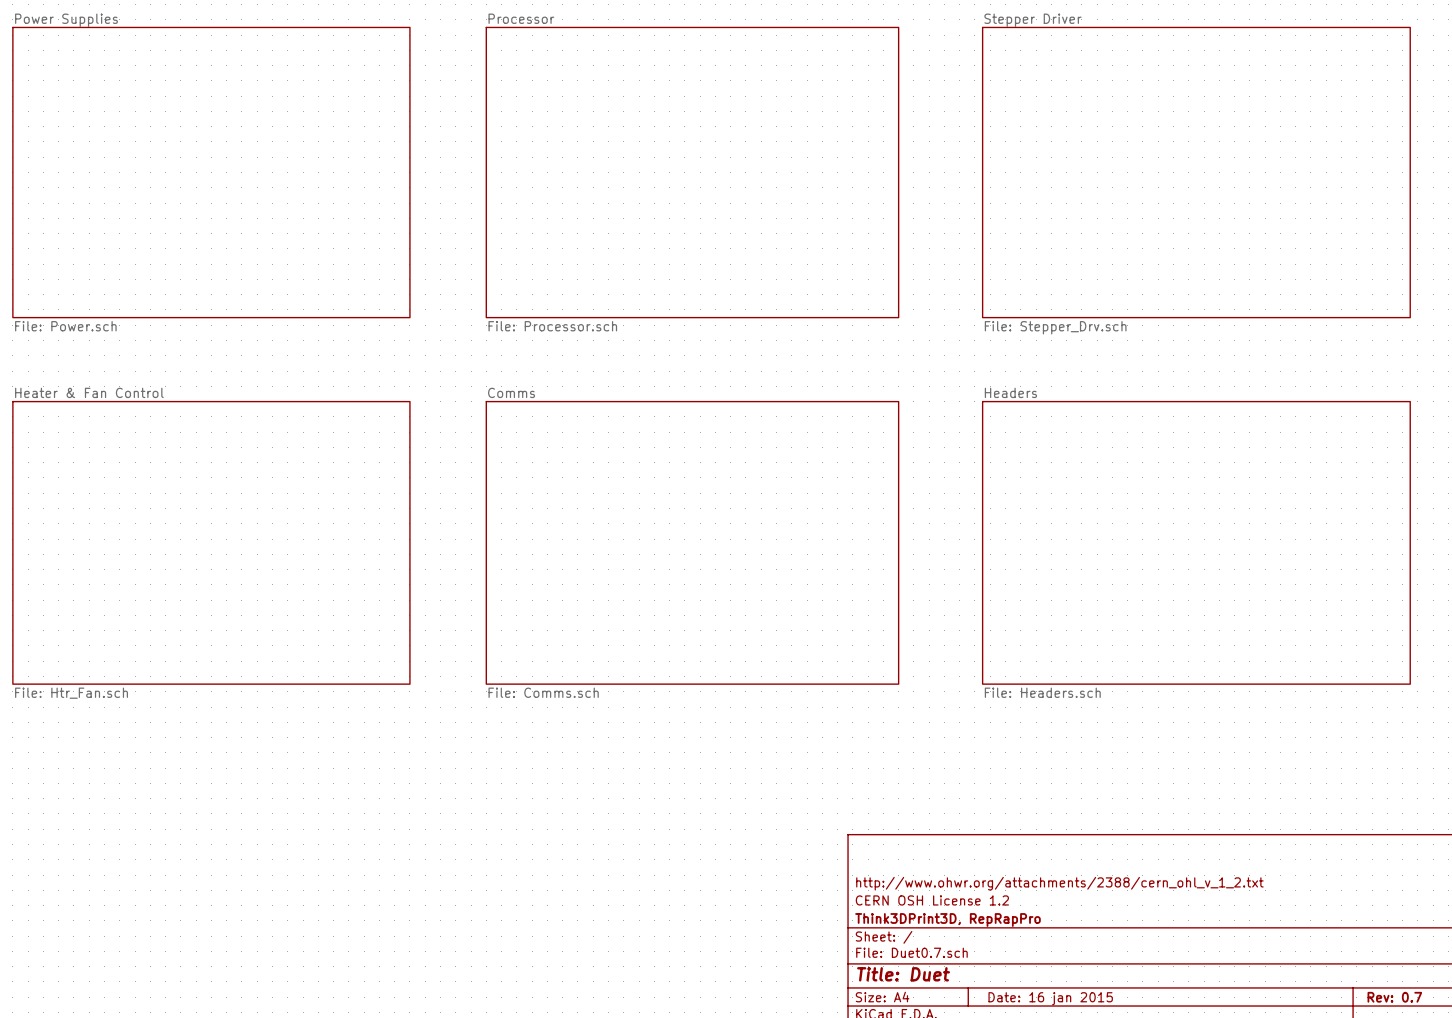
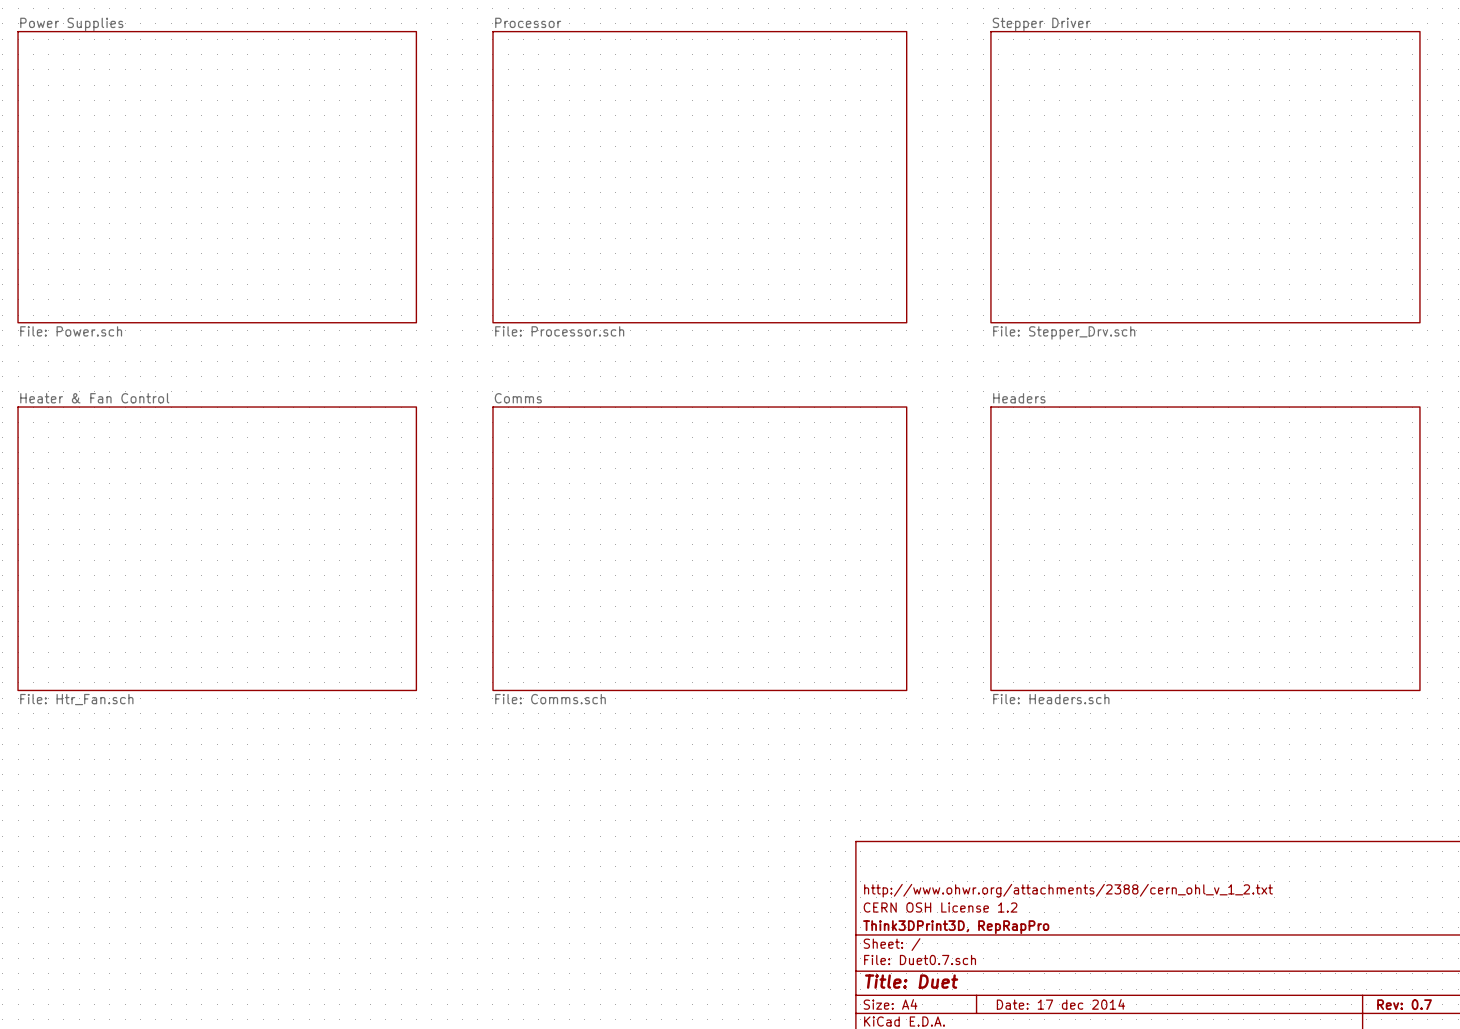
title block: Date: 16 jan 2015 (1050, 998) -> Date: 17 dec 2014 (1060, 1004)

